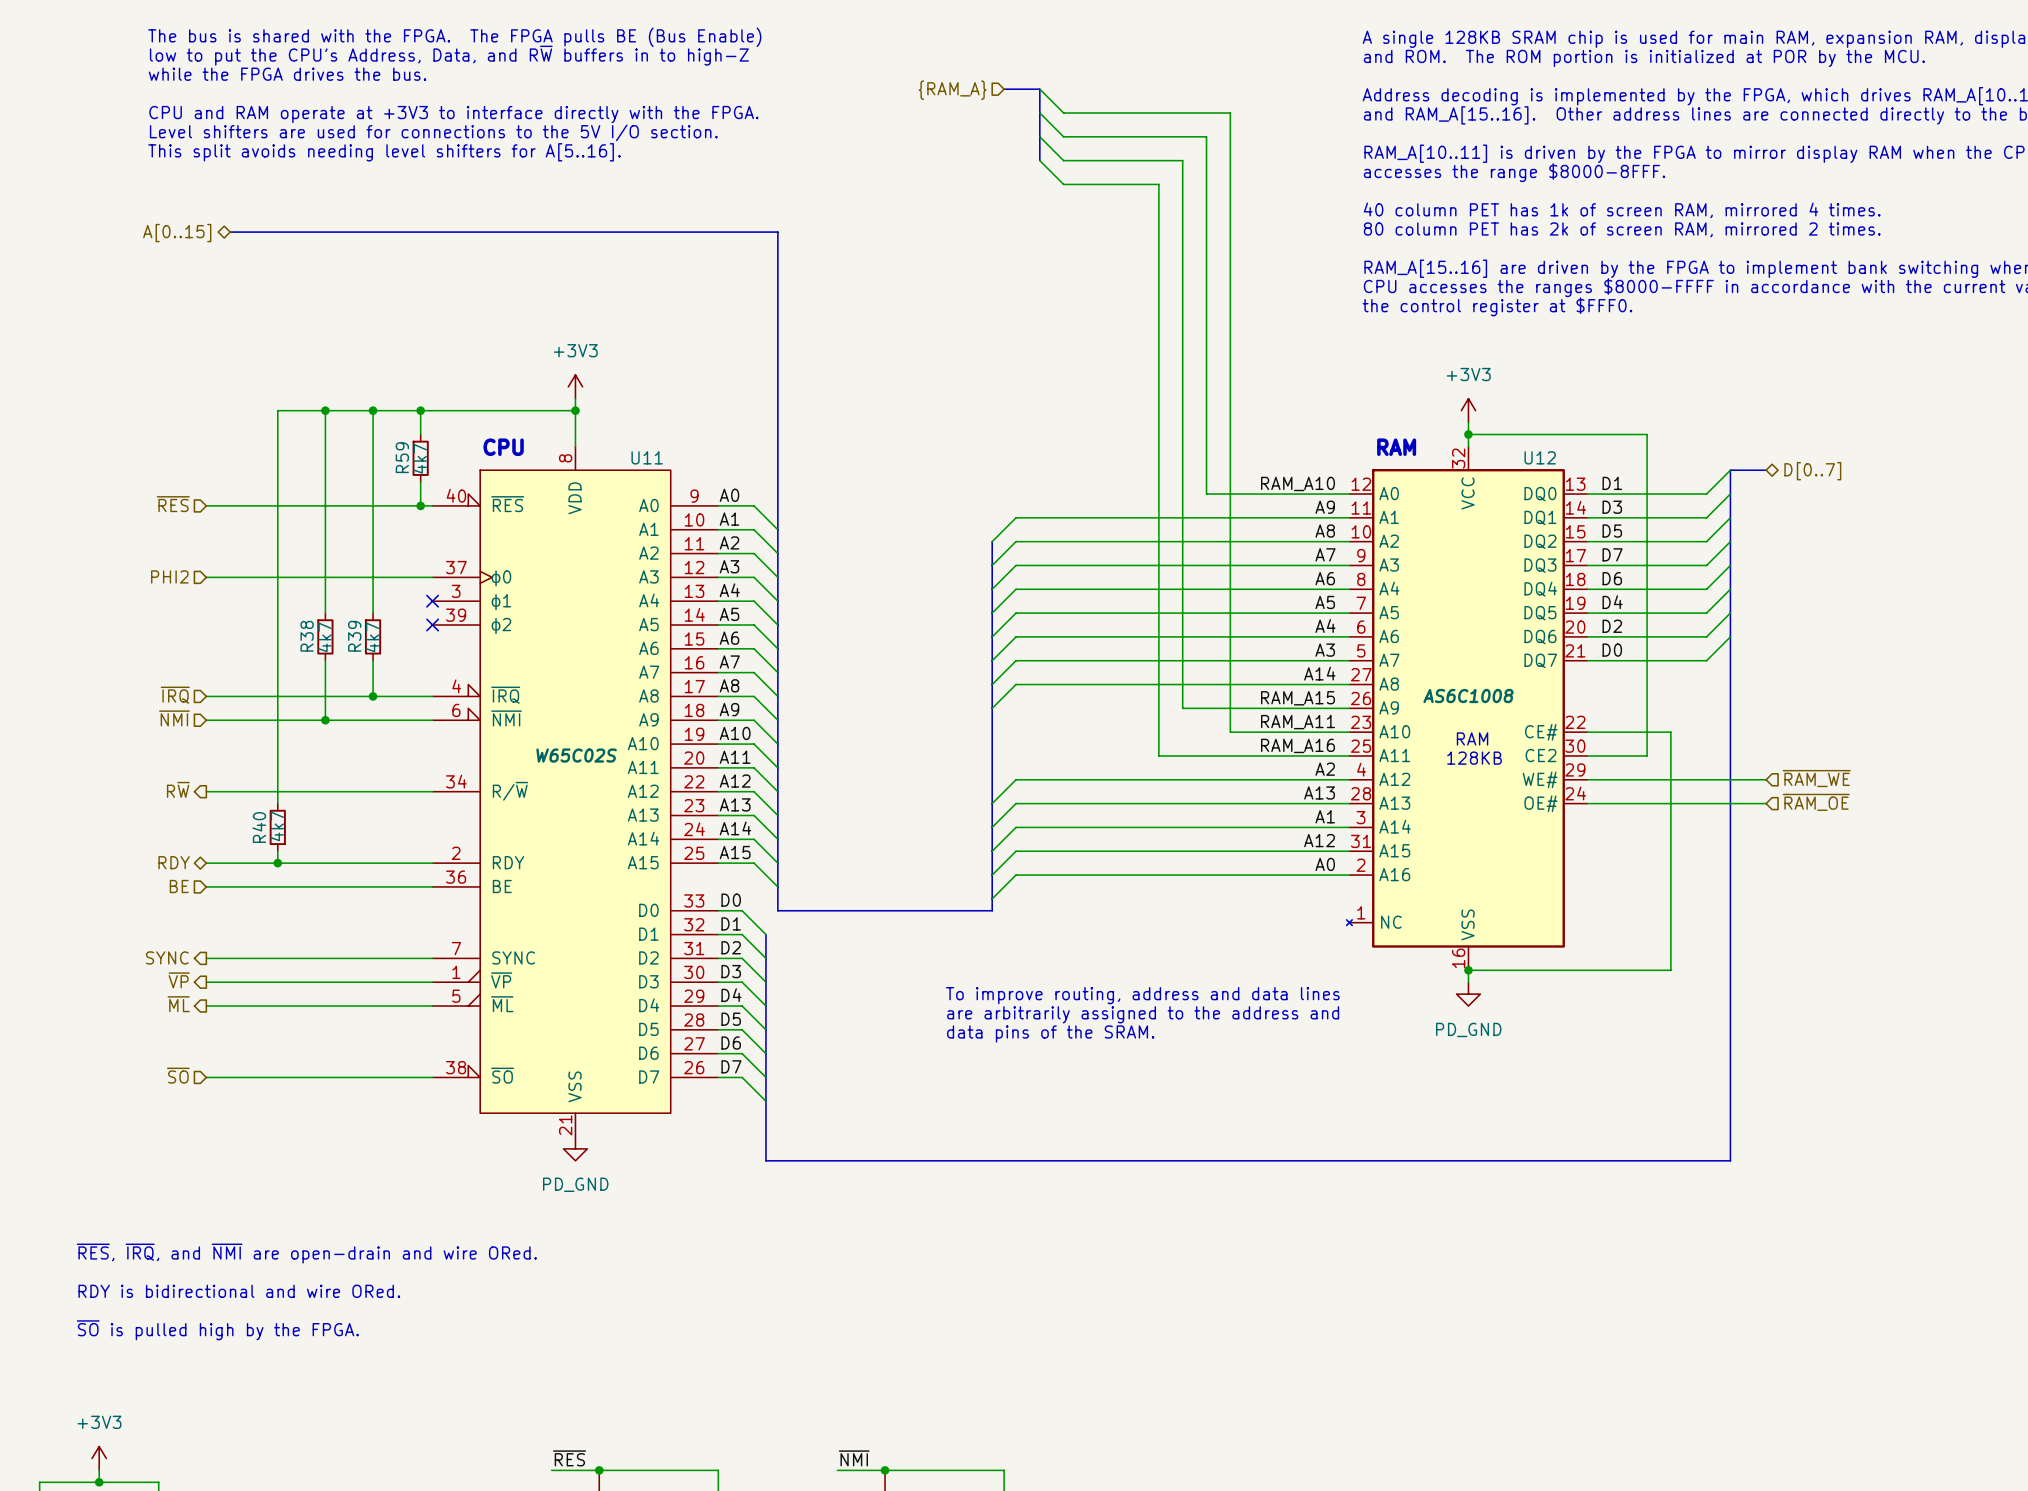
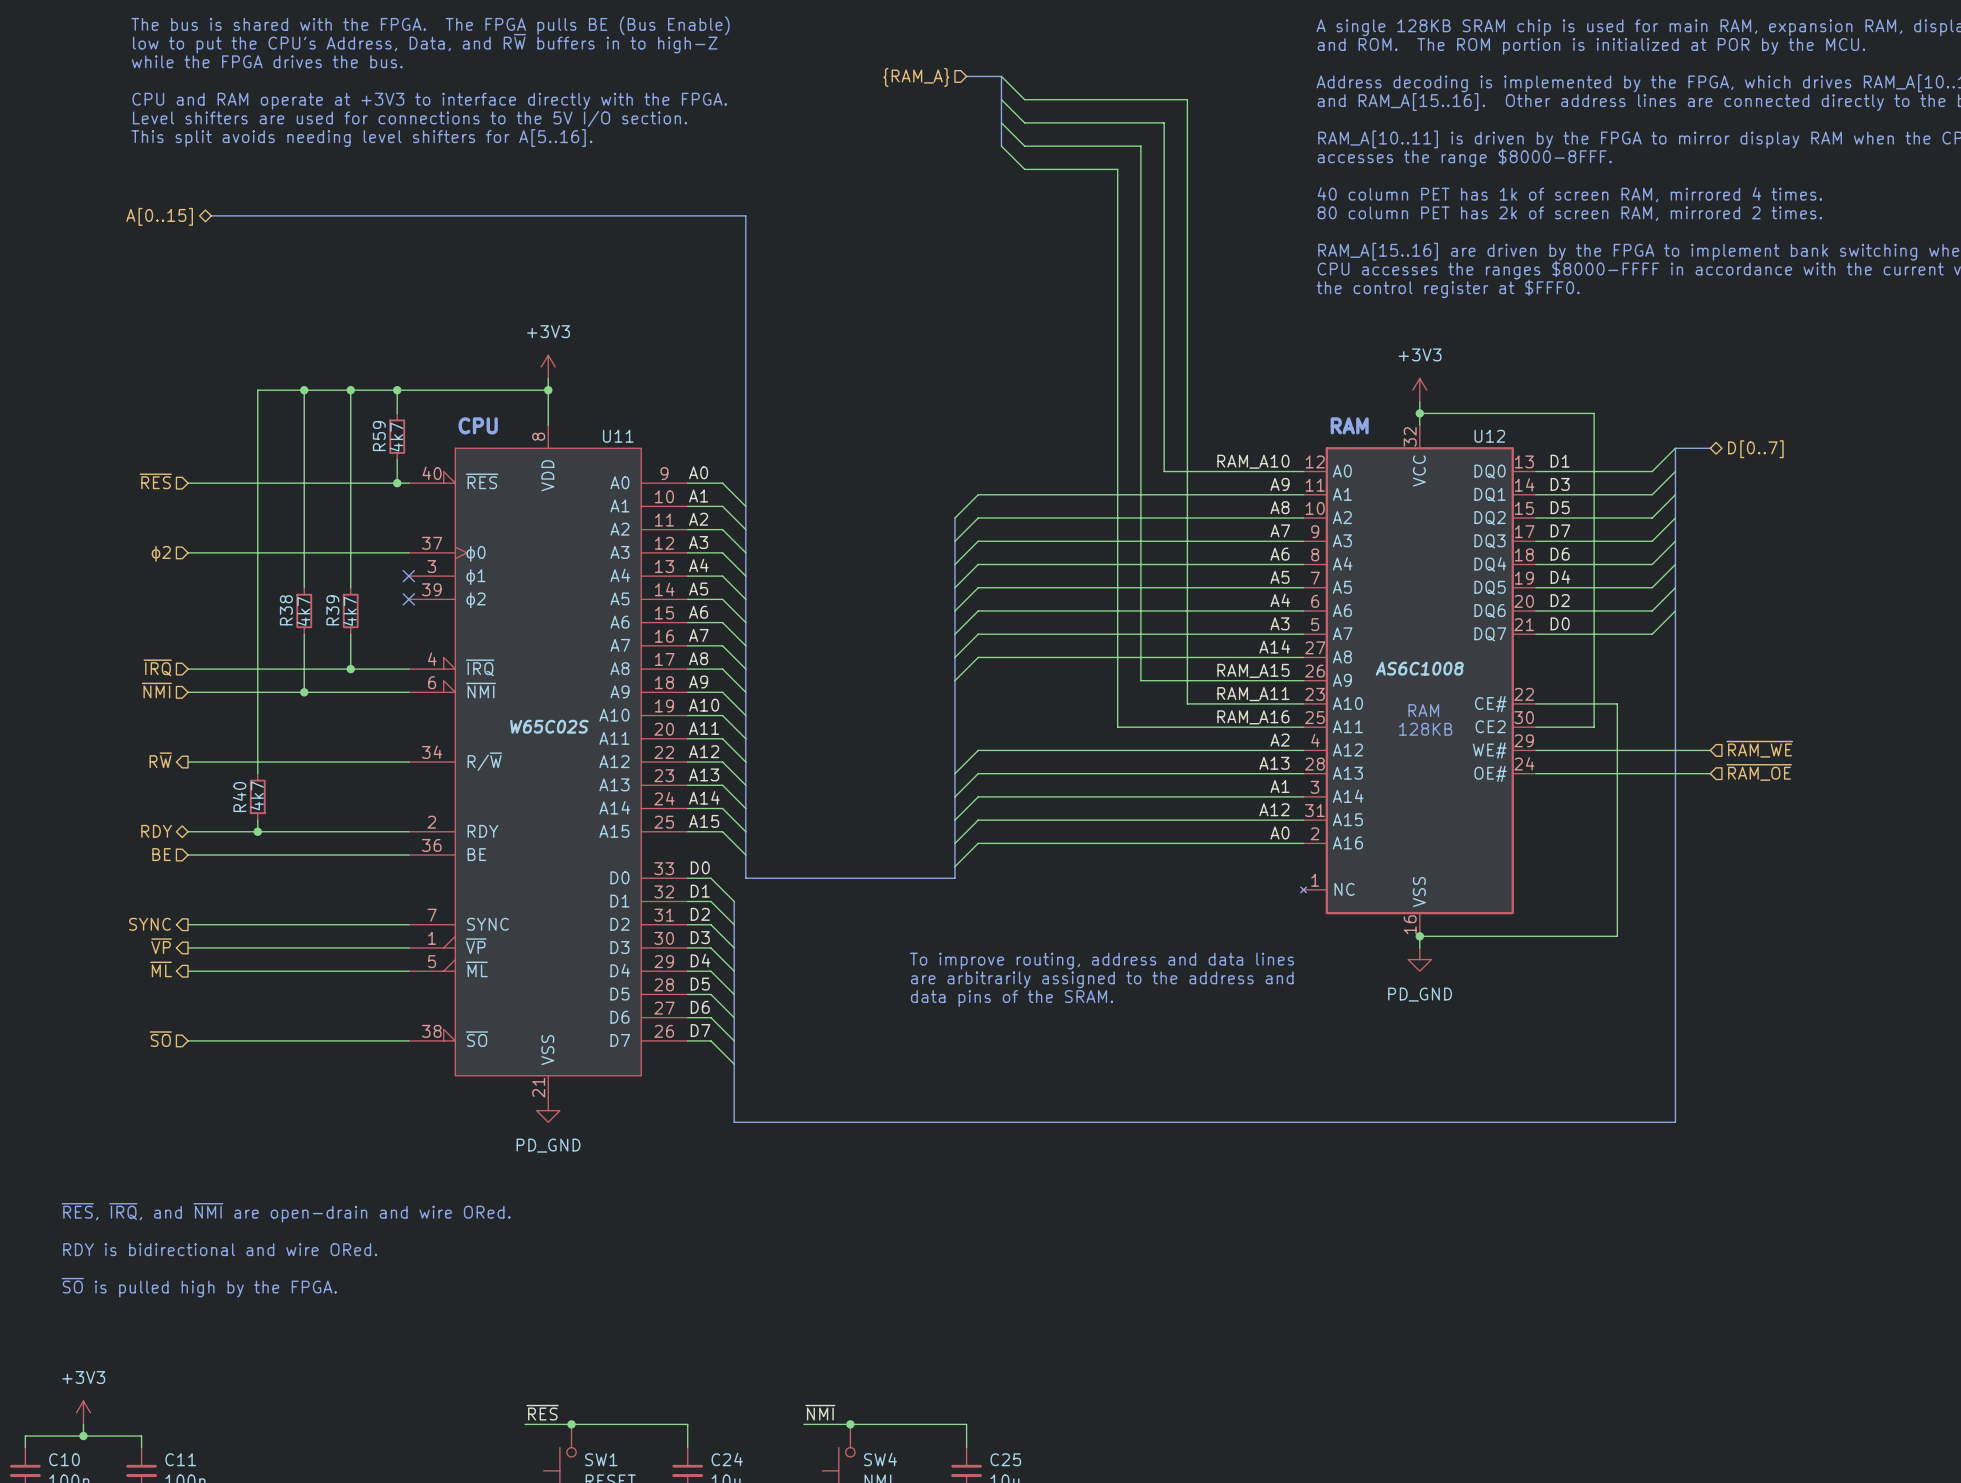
hierarchical label: PHI2 (169, 576) -> ϕ2 (160, 553)

